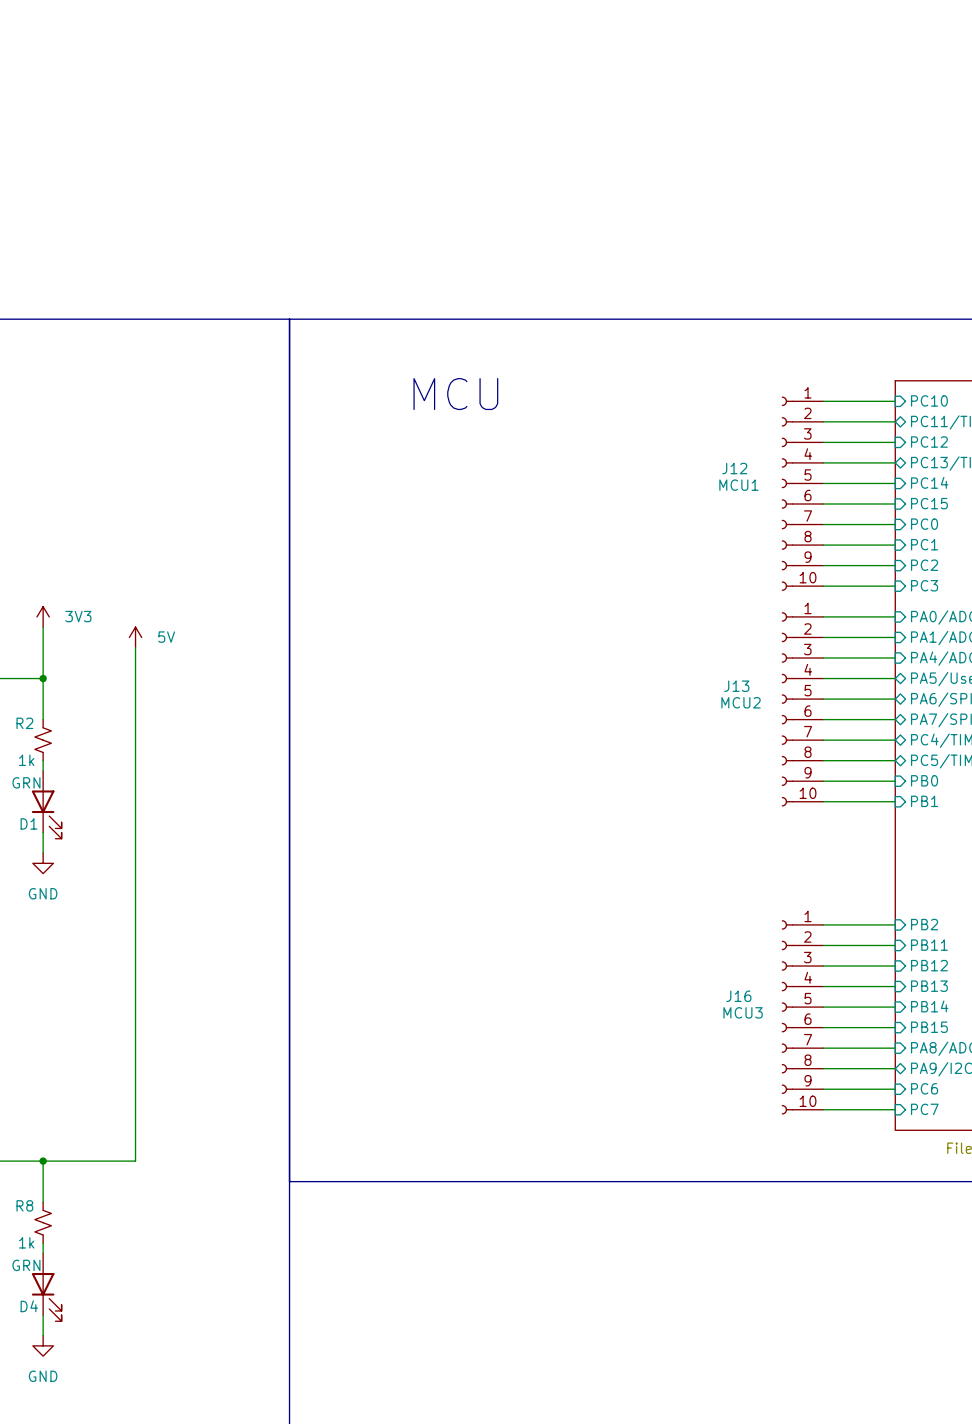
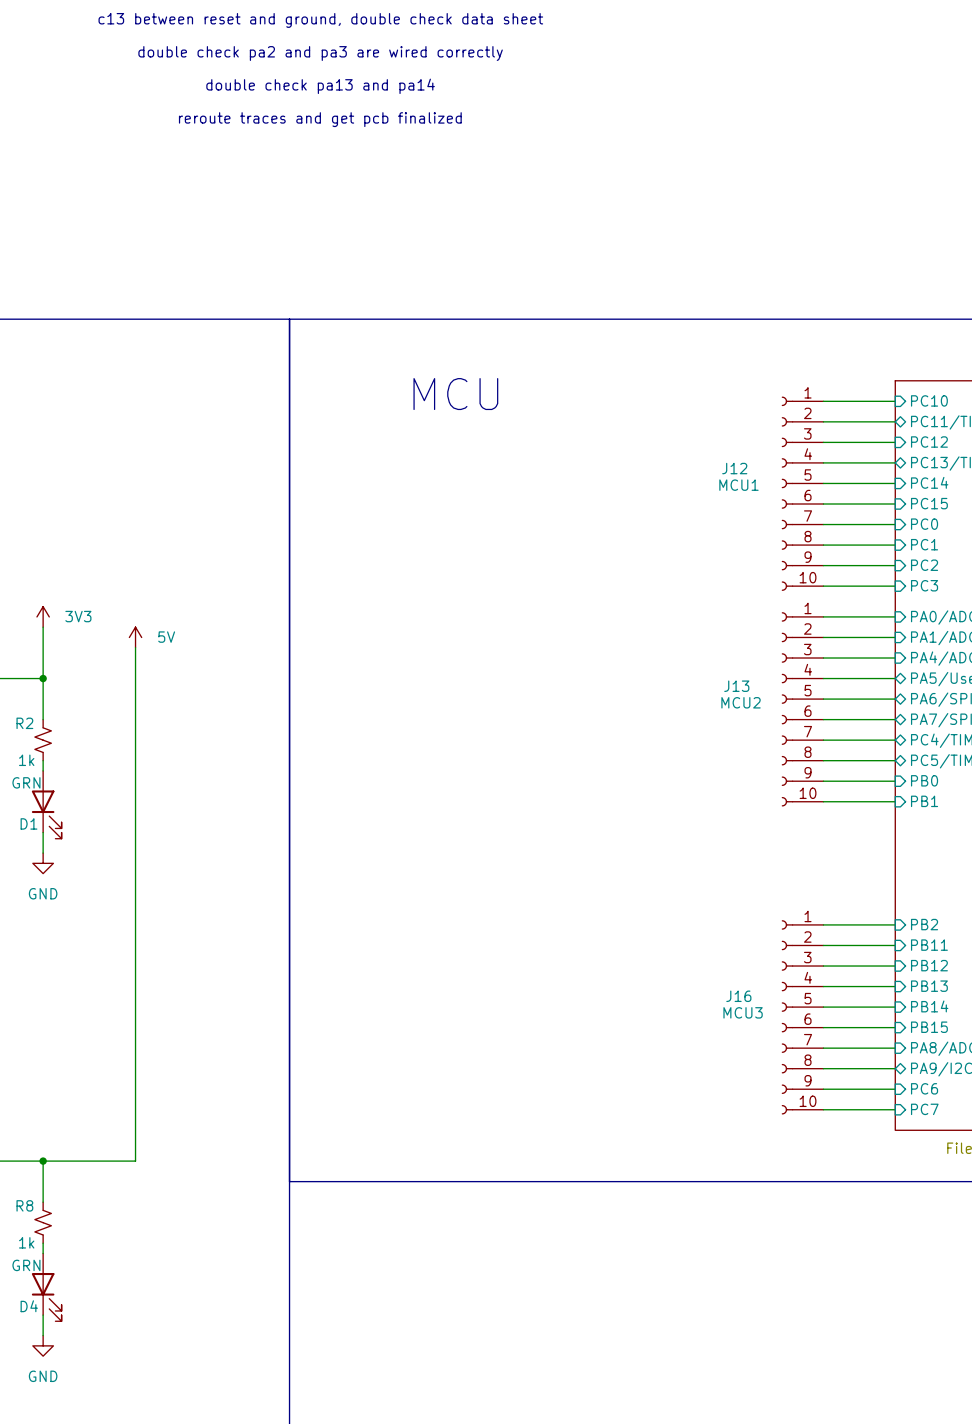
text: none -> c13 between reset and ground, double check data sheet (320, 20)
text: none -> double check pa2 and pa3 are wired correctly (320, 53)
text: none -> double check pa13 and pa14 (320, 86)
text: none -> reroute traces and get pcb finalized (320, 119)

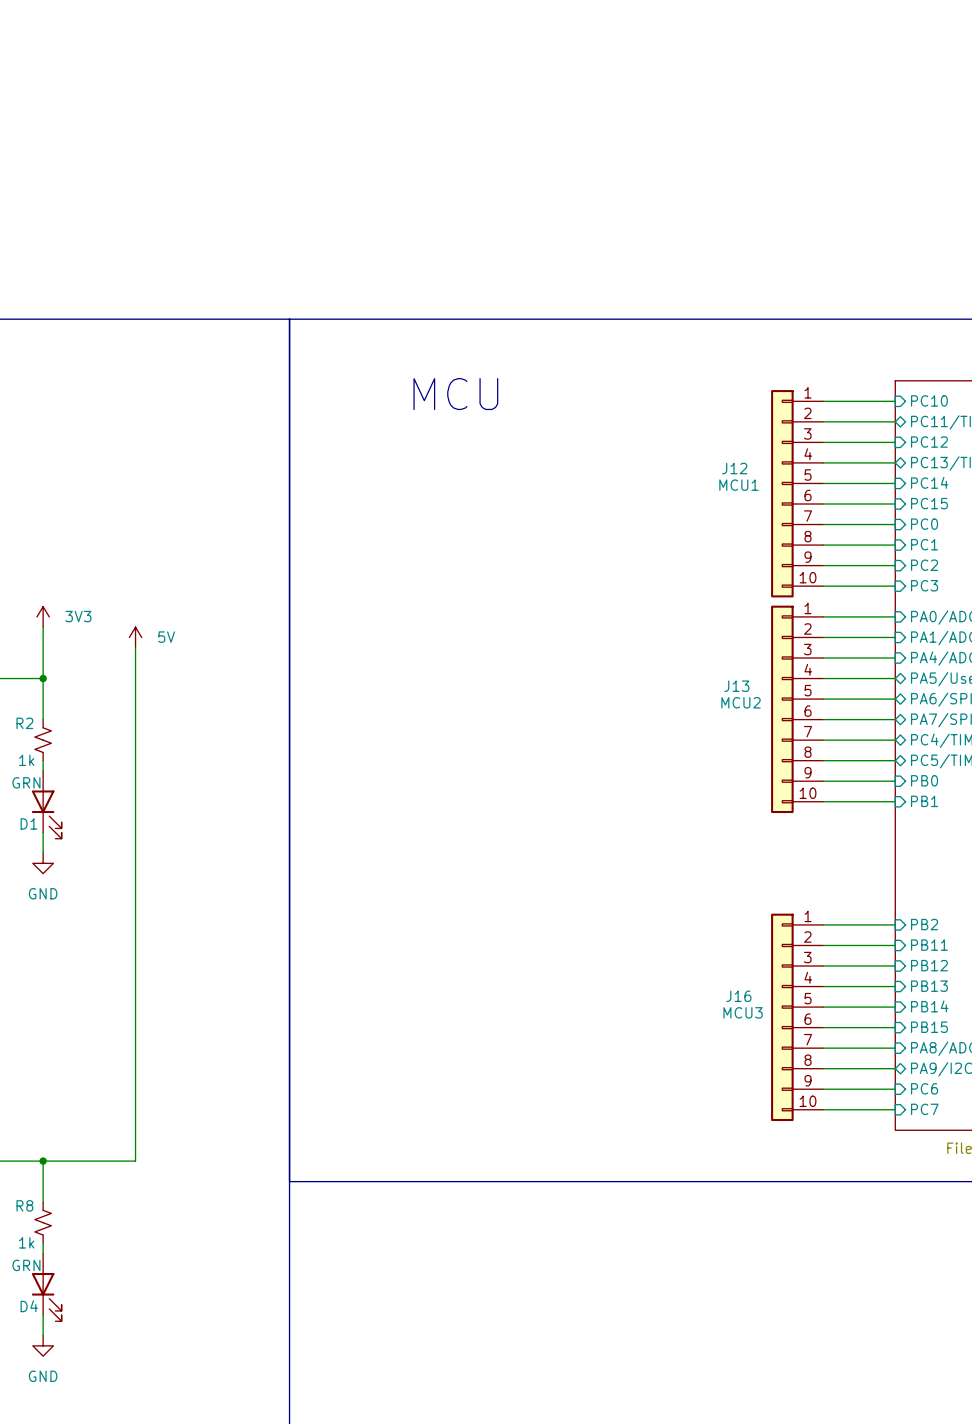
text: c13 between reset and ground, double check data sheet (320, 20) -> none
text: double check pa2 and pa3 are wired correctly (320, 53) -> none
text: double check pa13 and pa14 (320, 86) -> none
text: reroute traces and get pcb finalized (320, 119) -> none
J12 symbol: [781, 396, 824, 591] -> [771, 390, 824, 598]
J13 symbol: [781, 612, 824, 807] -> [771, 605, 824, 814]
J16 symbol: [781, 920, 824, 1115] -> [771, 913, 824, 1122]

